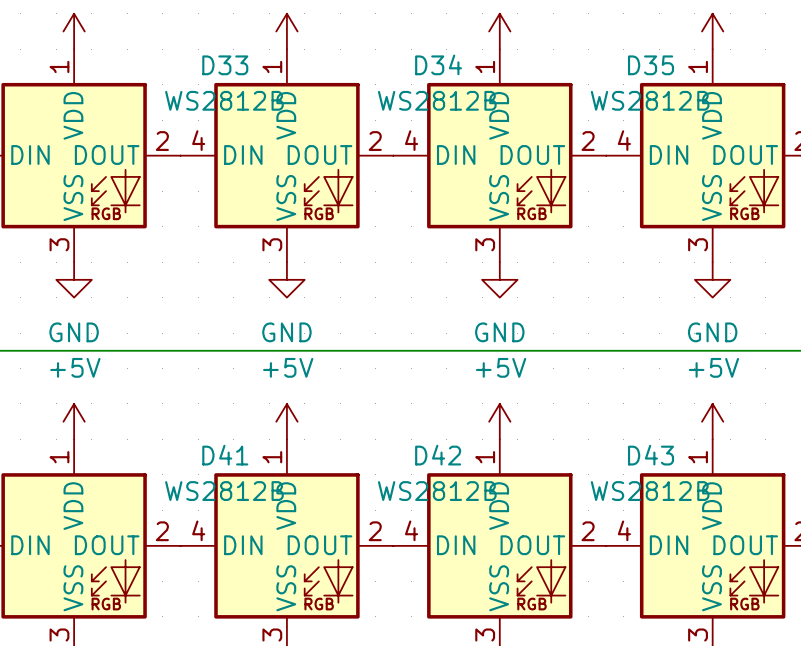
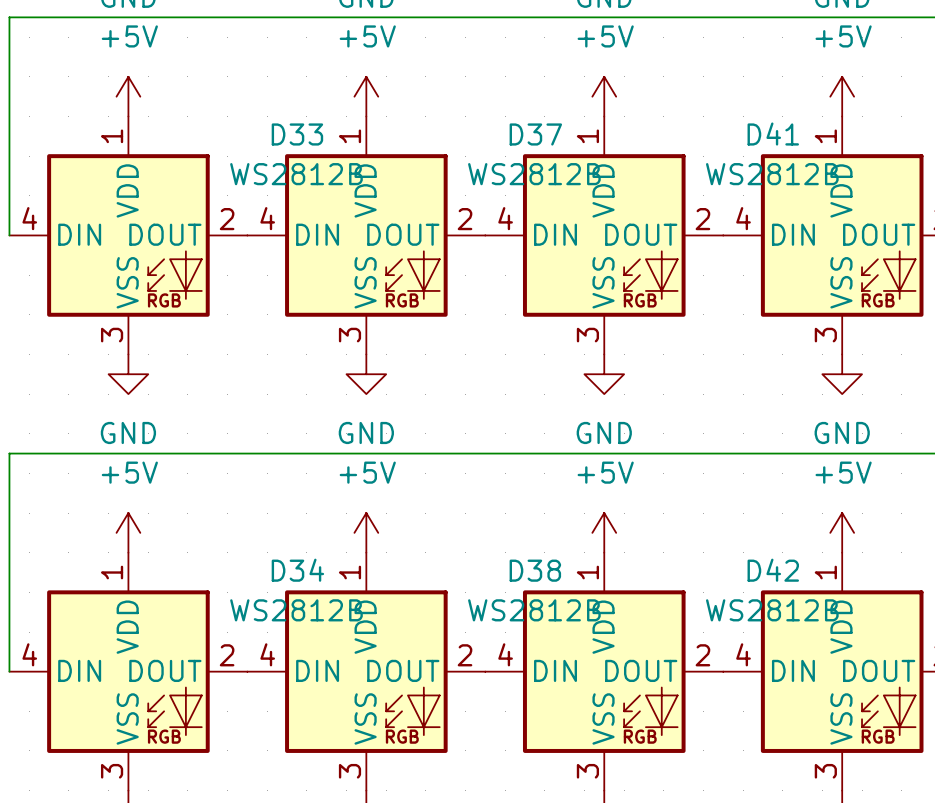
D34 name: D34 (438, 64) -> D37 (535, 134)
D35 name: D35 (651, 65) -> D41 (773, 134)
D41 name: D41 (225, 455) -> D34 (297, 570)
D42 name: D42 (438, 455) -> D38 (535, 570)
D43 name: D43 (651, 455) -> D42 (773, 570)

